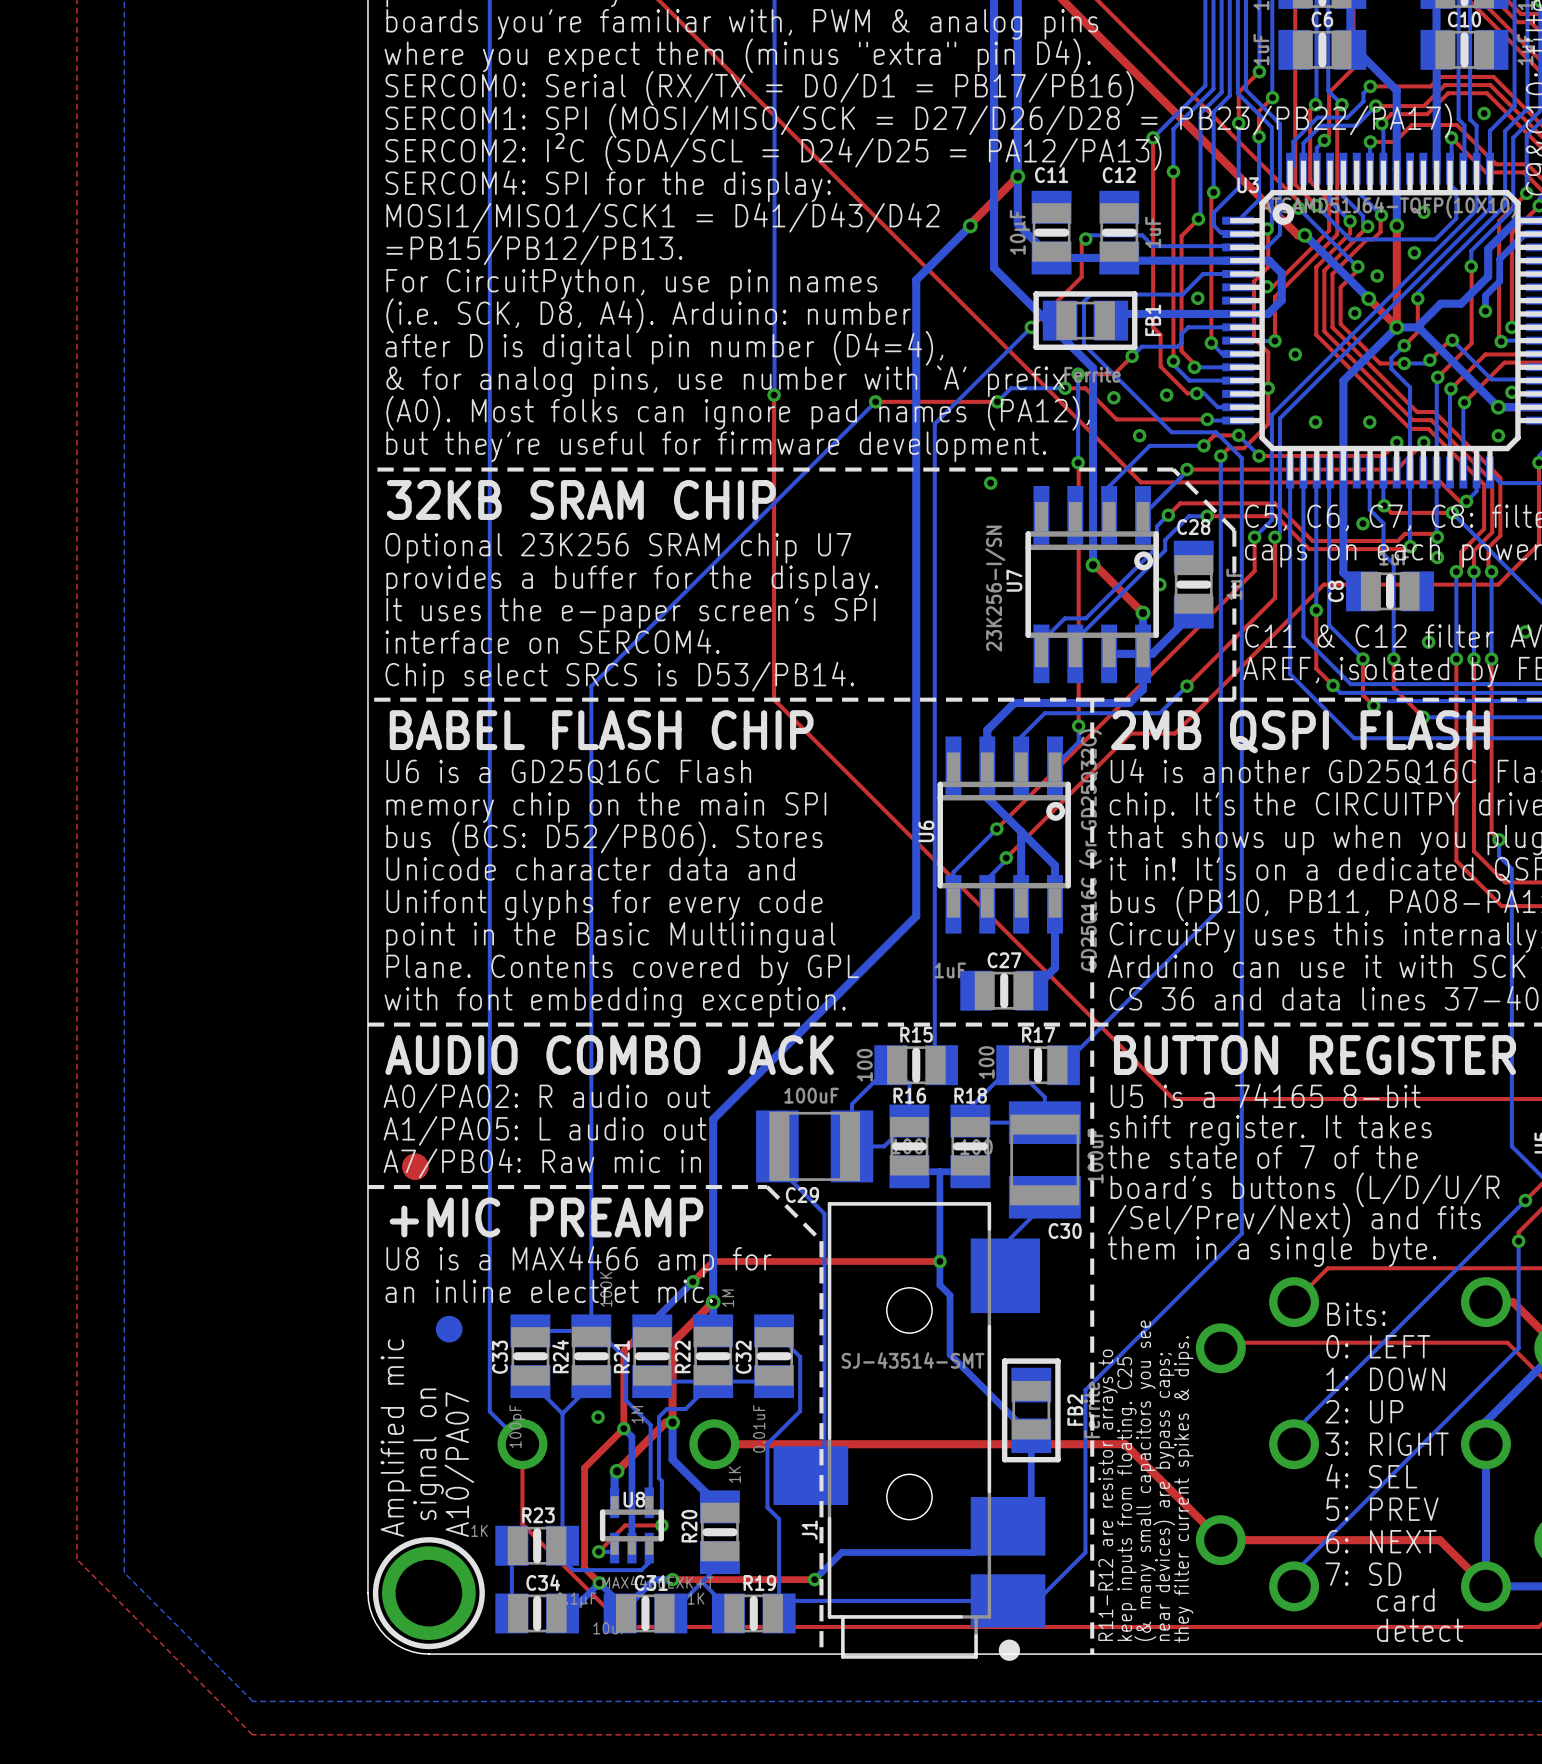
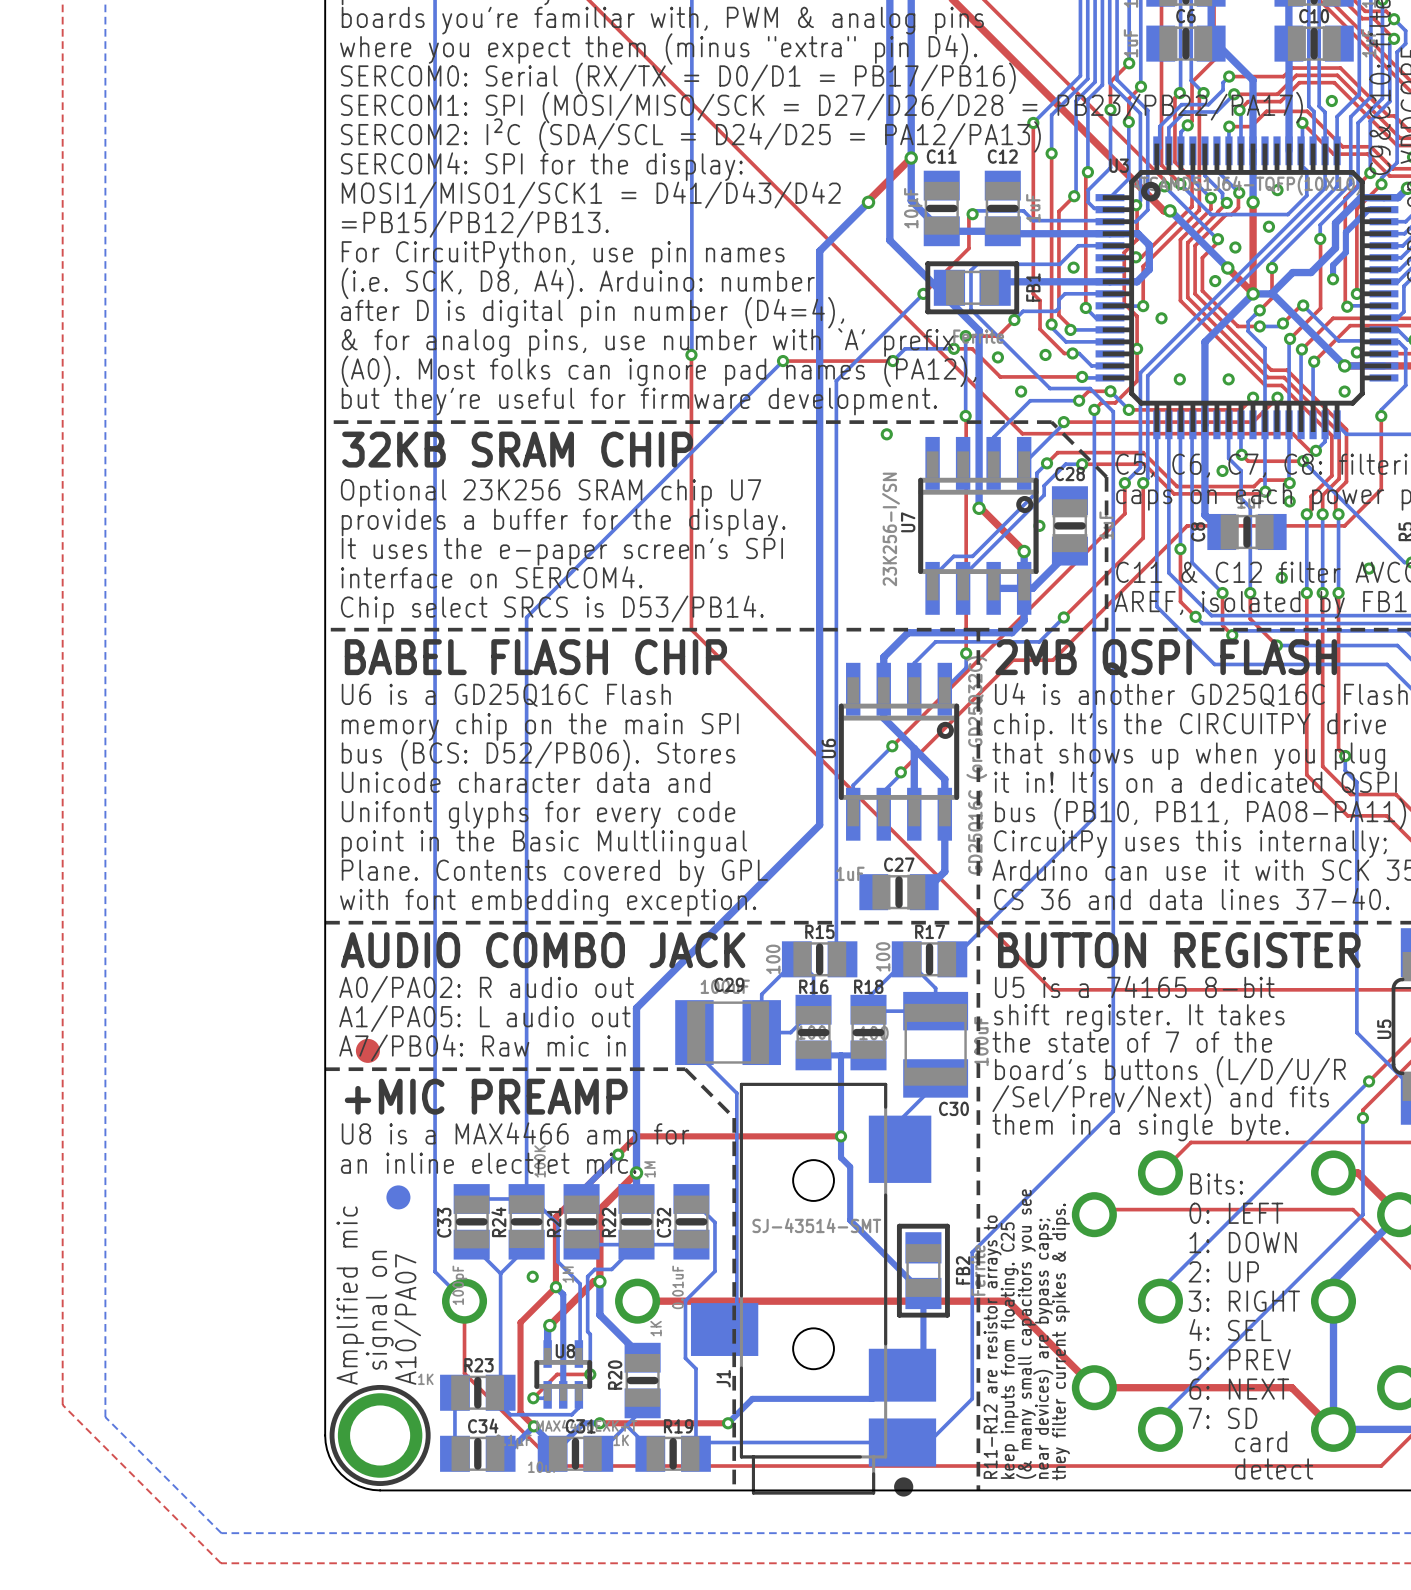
C29 name position: C29 (802, 1195) -> C29 (729, 984)

